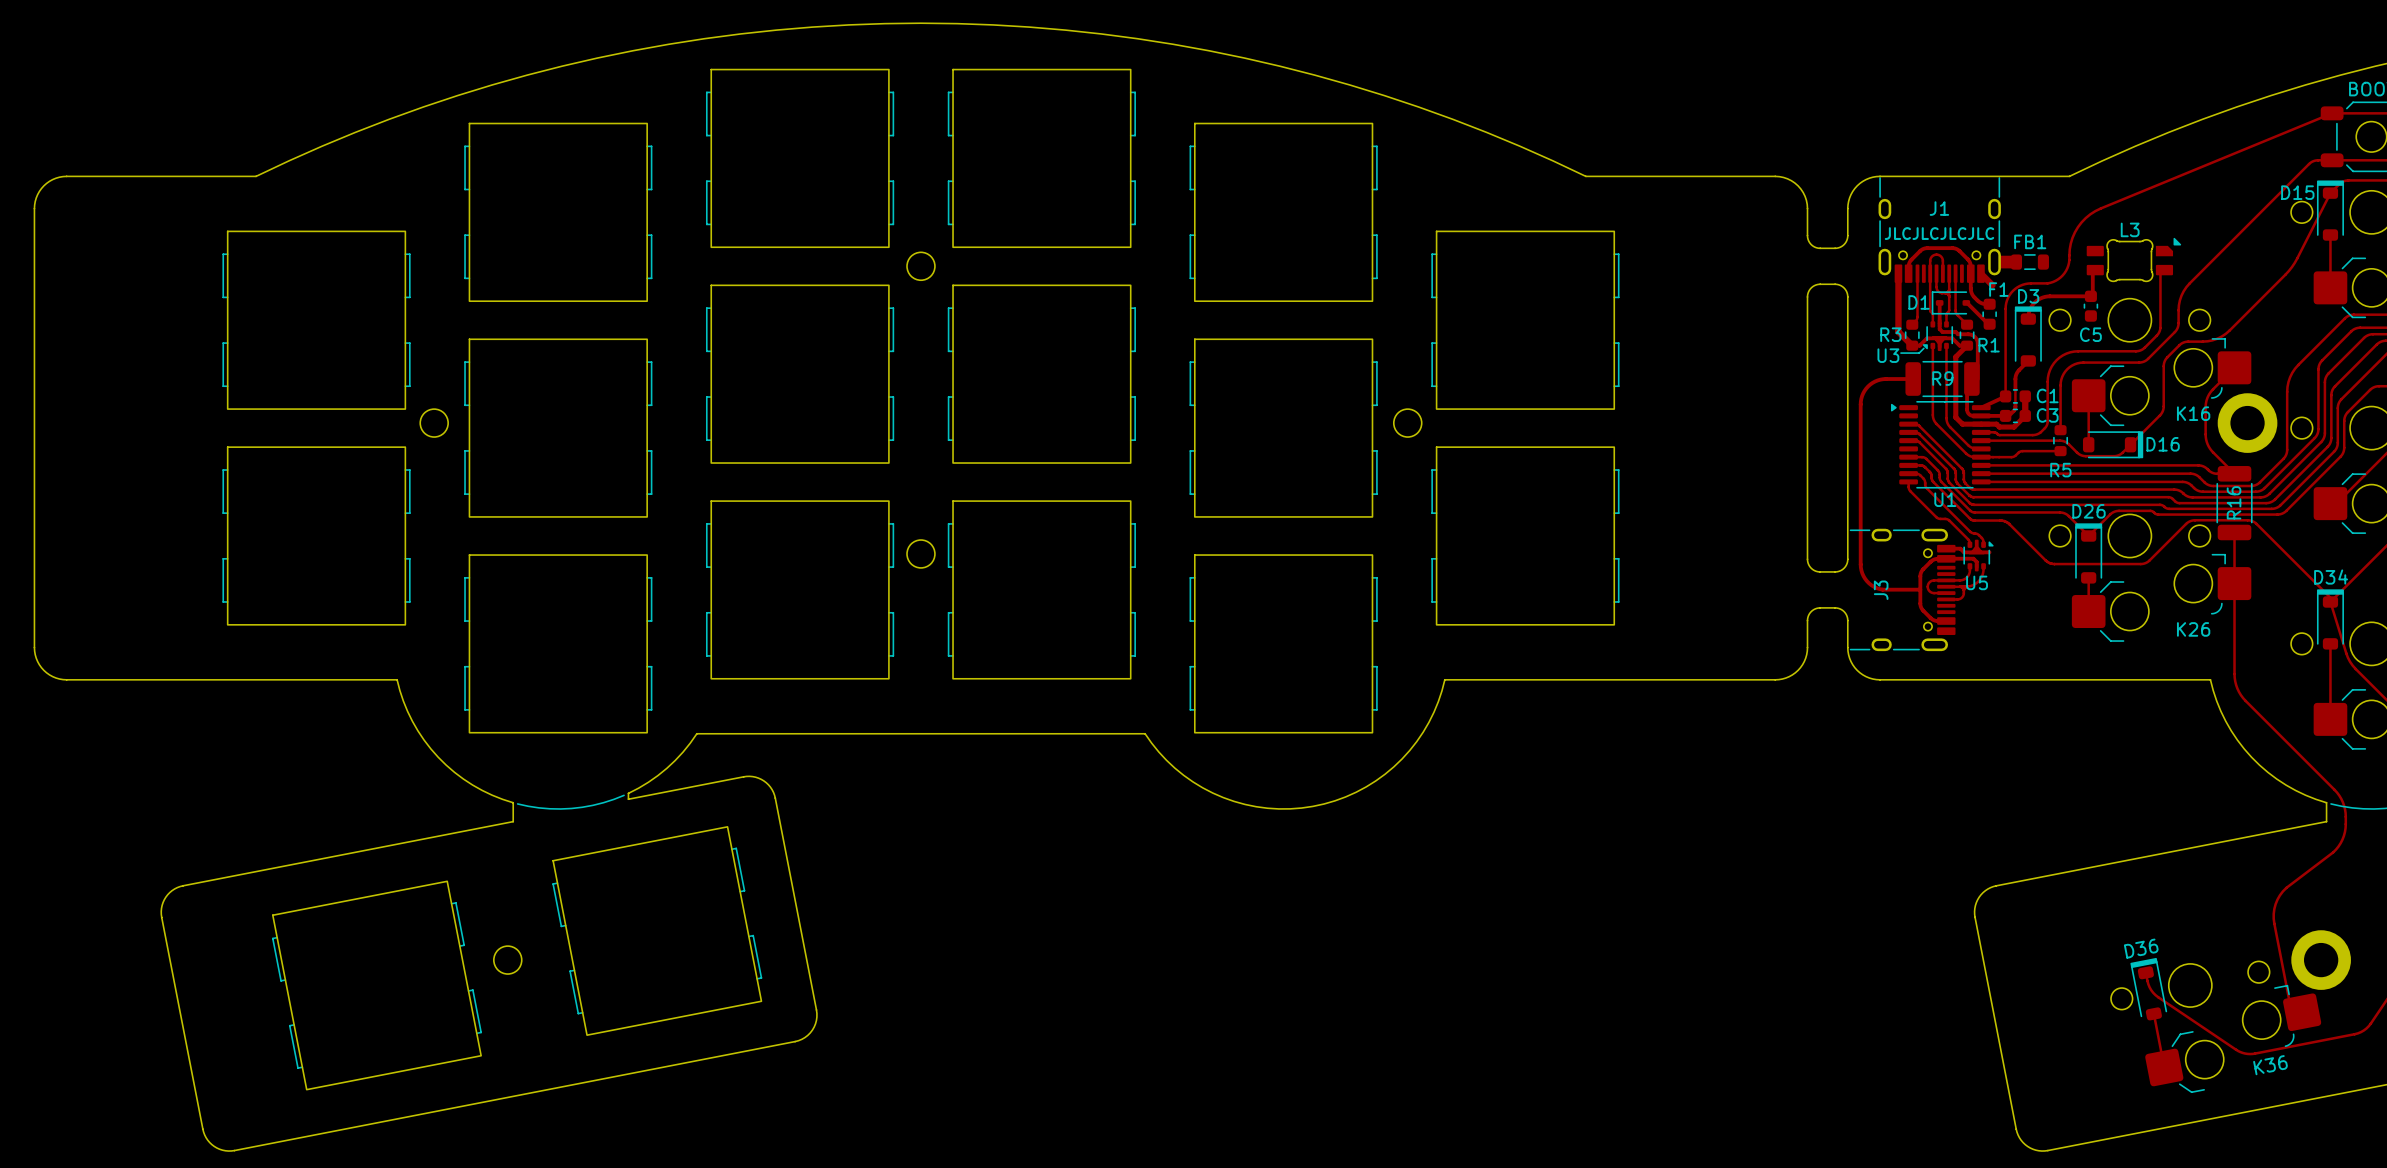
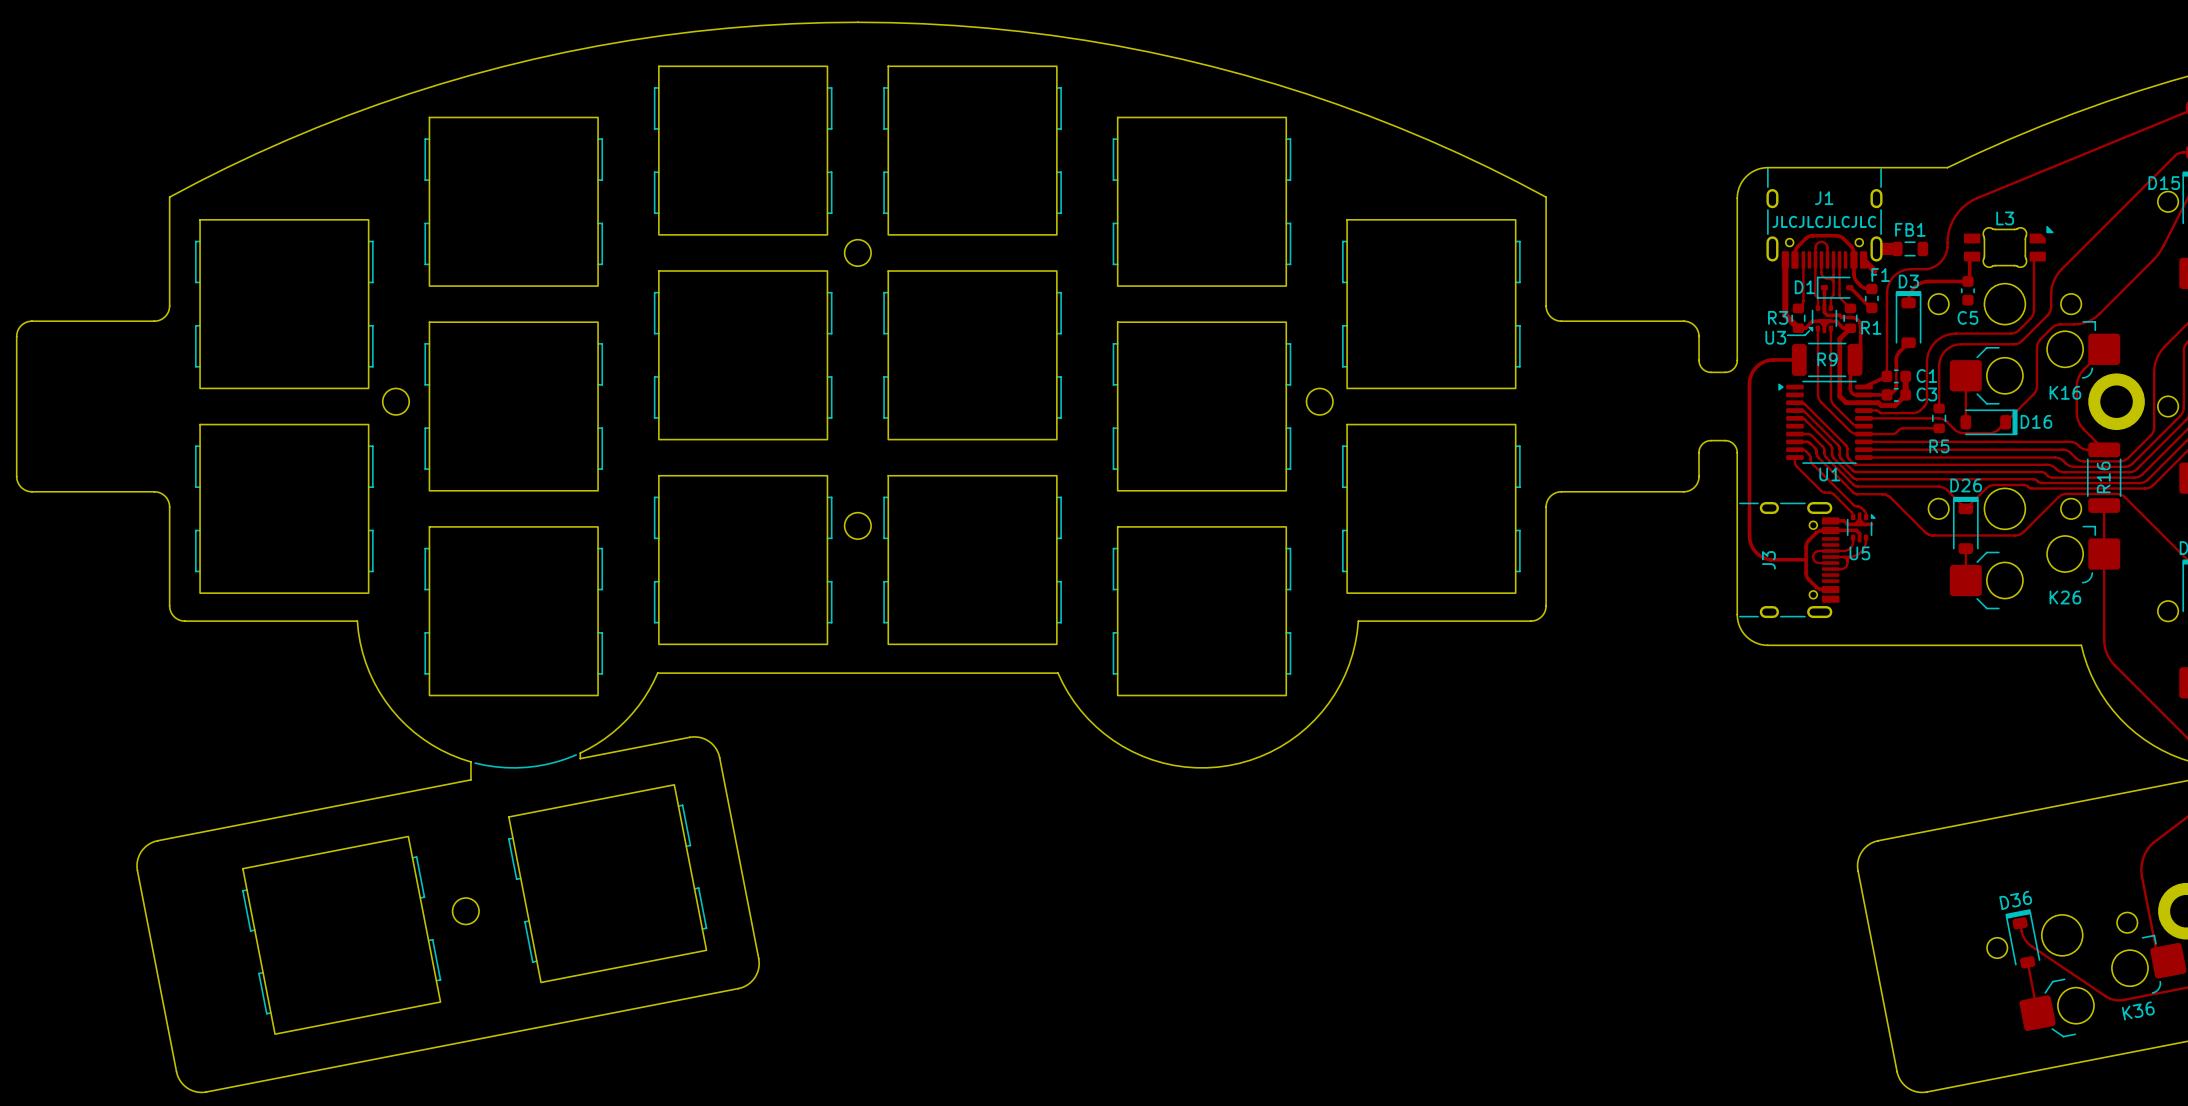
board edge: (1847, 235) (1845, 243) (1837, 247) (1818, 248) (1811, 244) (1807, 237) (1807, 208) (1805, 196) (1794, 183) (1783, 177) (1585, 176) (1486, 132) (1384, 95) (1279, 66) (1208, 50) (1101, 33) (993, 24) (884, 23) (812, 27) (740, 33) (668, 44) (597, 58) (527, 75) (457, 95) (389, 119) (321, 146) (256, 176) (66, 176) (52, 179) (41, 188) (34, 205) (34, 354) -> (1699, 336) (1694, 325) (1685, 321) (1561, 321) (1553, 318) (1548, 314) (1546, 307) (1546, 197) (1458, 153) (1368, 115) (1244, 75) (1117, 45) (988, 28) (857, 22) (727, 28) (598, 45) (471, 75) (347, 115) (257, 153) (169, 197) (169, 305) (167, 313) (161, 319) (154, 321) (30, 321) (21, 325) (16, 336)
board edge: (1847, 296) (1844, 287) (1836, 284) (1817, 284) (1809, 290) (1807, 296) (1807, 354) -> (1737, 282) (1737, 223)
board edge: (1847, 379) (1847, 560) (1844, 568) (1835, 571) (1816, 571) (1810, 567) (1807, 560) (1807, 379) -> (1737, 360) (1733, 368) (1725, 372) (1706, 371) (1700, 366) (1699, 360)
board edge: (34, 501) (34, 651) (39, 664) (49, 674) (66, 679) (397, 679) (412, 721) (438, 757) (472, 785) (513, 802) -> (16, 476) (20, 485) (30, 491) (154, 491) (161, 493) (166, 497) (169, 505) (169, 605) (171, 612) (175, 617) (184, 621) (357, 621) (362, 652) (369, 672) (391, 709) (406, 725) (431, 744) (470, 761)
board edge: (1847, 647) (1847, 619) (1845, 612) (1837, 608) (1818, 608) (1812, 610) (1807, 617) (1807, 651) (1804, 661) (1795, 672) (1782, 679) (1444, 679) (1438, 701) (1423, 732) (1409, 750) (1393, 766) (1375, 780) (1356, 792) (1324, 804) (1301, 808) (1278, 808) (1256, 806) (1234, 801) (1212, 793) (1192, 781) (1174, 768) (1158, 751) (1145, 733) (696, 733) (683, 752) (666, 768) (648, 782) (628, 793) -> (1737, 614) (1737, 451) (1734, 445) (1729, 441) (1709, 440) (1703, 443) (1700, 447) (1698, 479) (1694, 487) (1688, 490) (1561, 491) (1550, 496) (1546, 507) (1545, 607) (1543, 613) (1538, 618) (1530, 621) (1358, 621) (1352, 653) (1345, 674) (1335, 693) (1322, 711) (1306, 727) (1280, 746) (1260, 756) (1239, 763) (1217, 767) (1184, 766) (1163, 763) (1132, 751) (1113, 740) (1088, 718) (1074, 701) (1058, 673) (657, 673) (644, 698) (626, 720) (604, 738) (580, 753)

